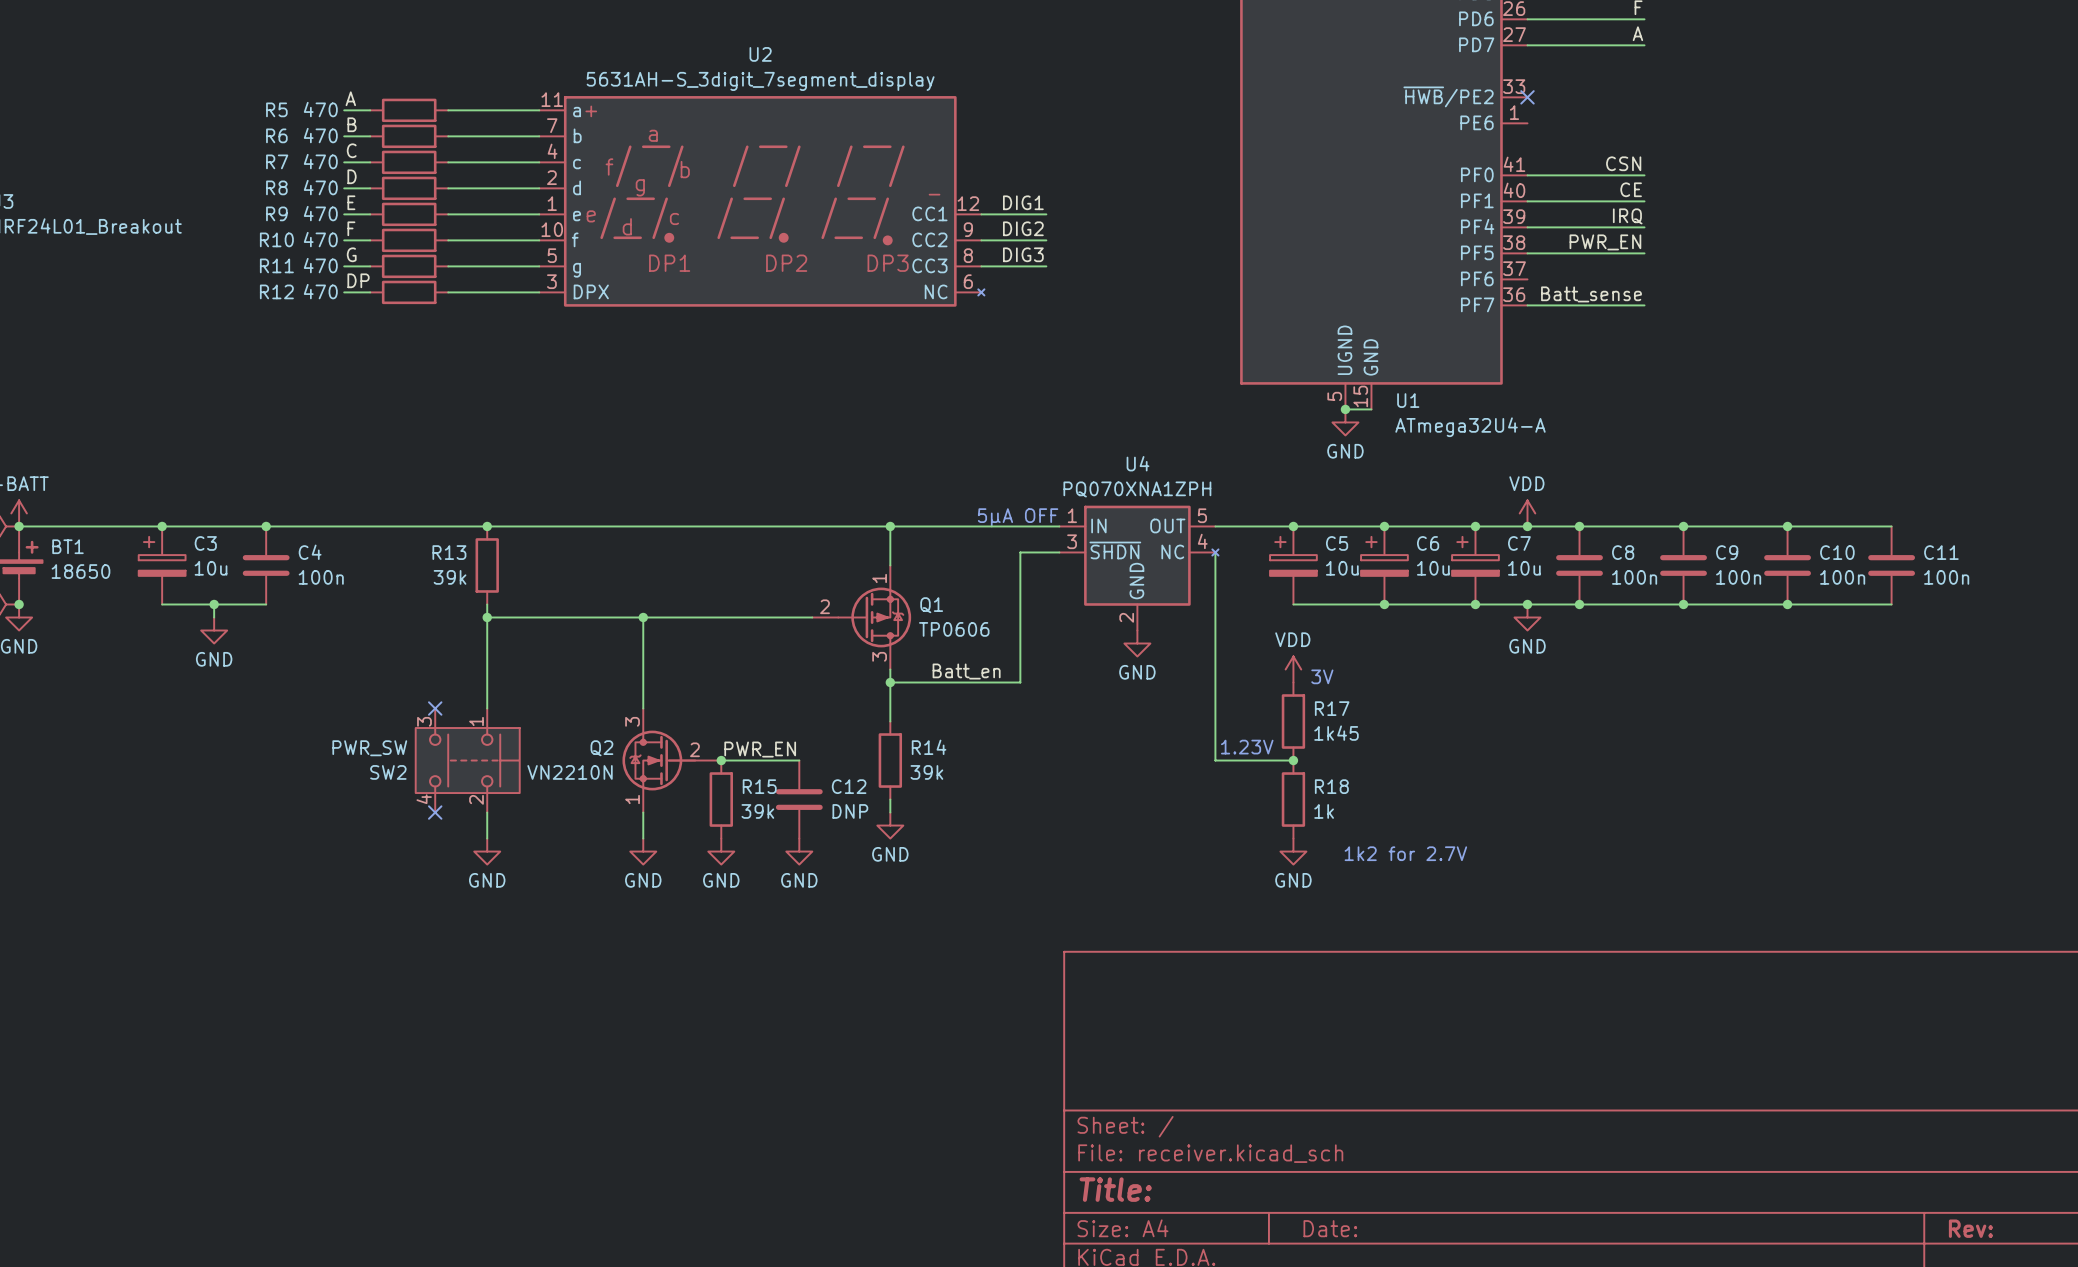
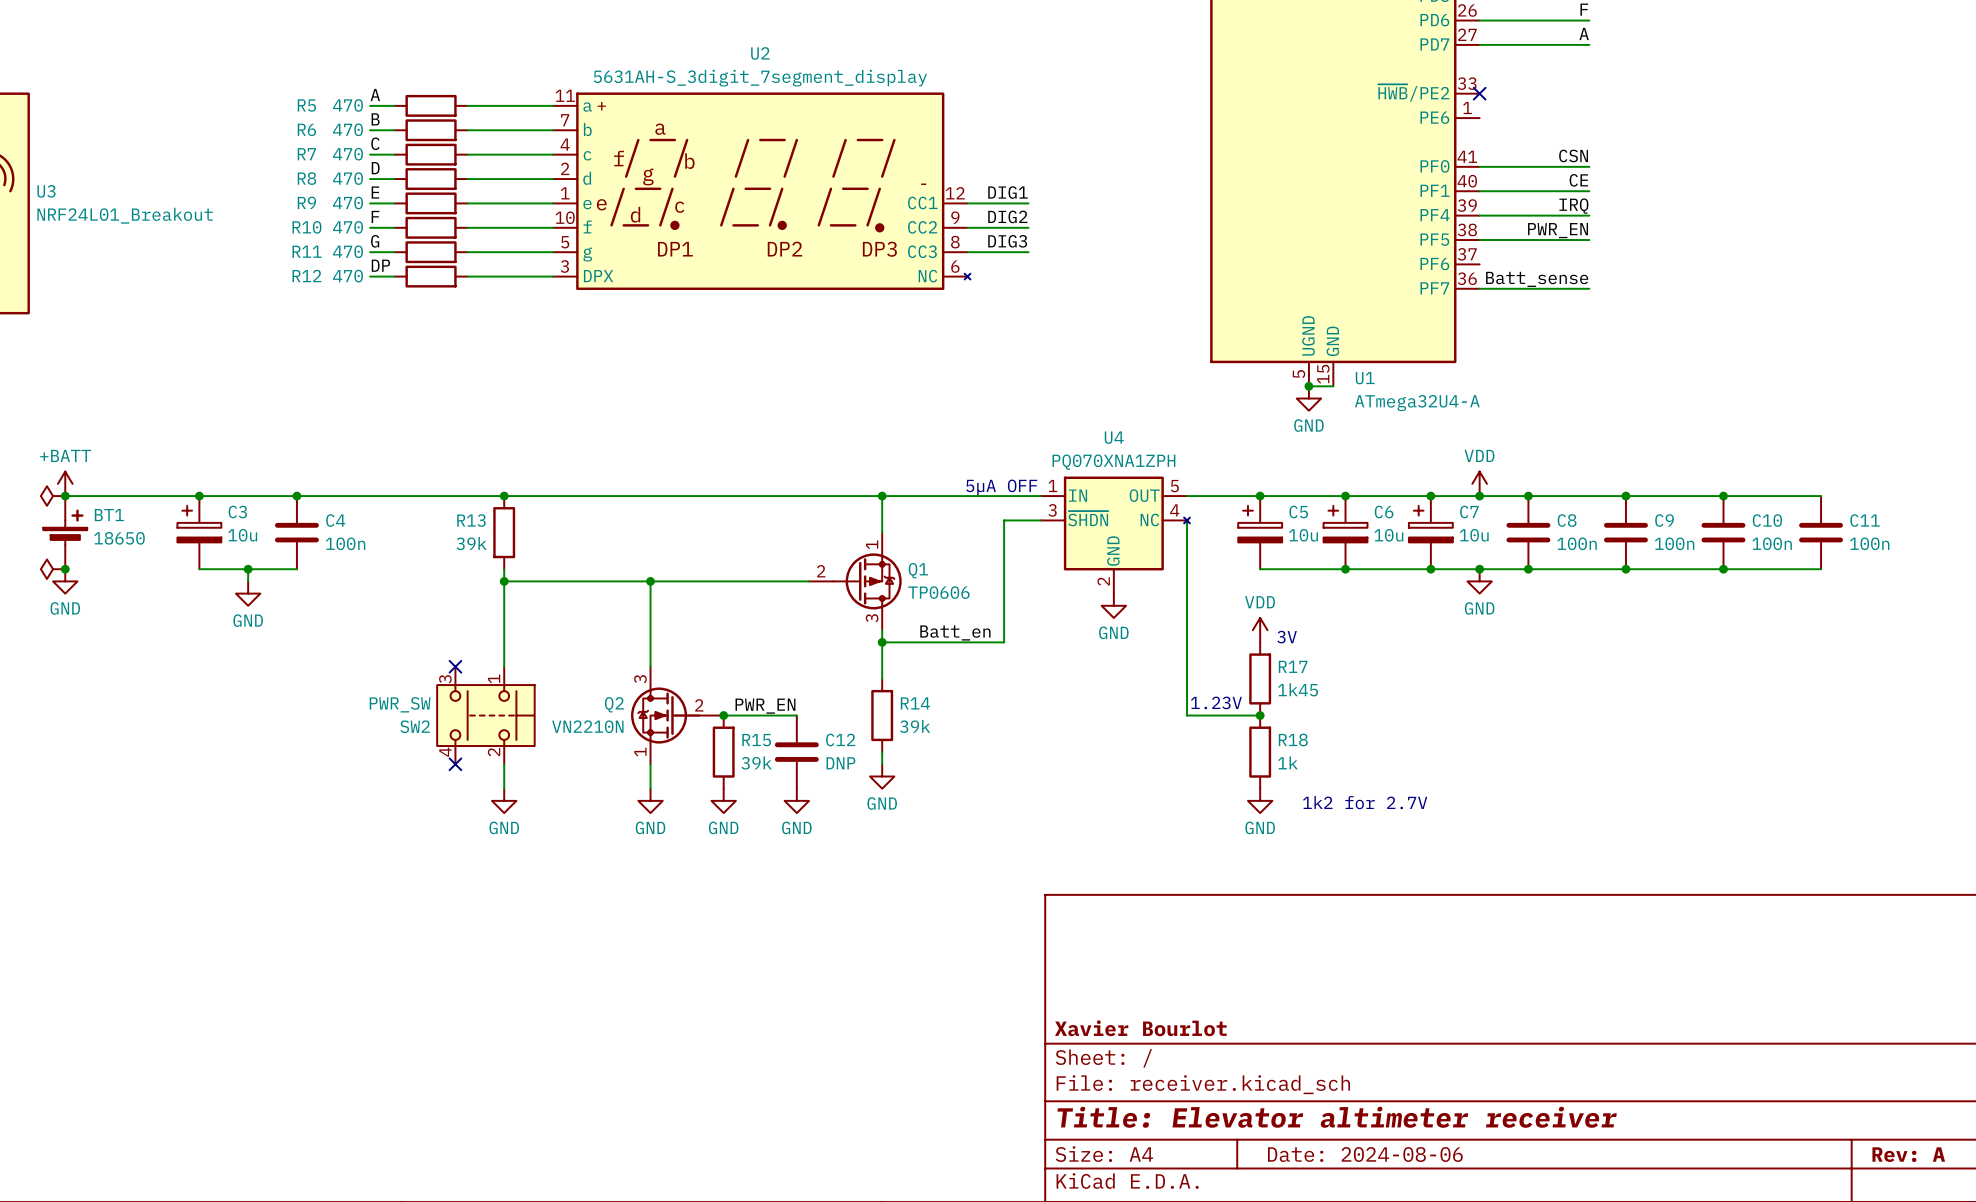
title block: none -> Xavier Bourlot (1140, 1028)
title block: Title: (1115, 1189) -> Title: Elevator altimeter receiver (1337, 1117)
title block: Date: (1330, 1228) -> Date: 2024-08-06 (1365, 1154)
title block: Rev: (1970, 1228) -> Rev: A (1908, 1154)

